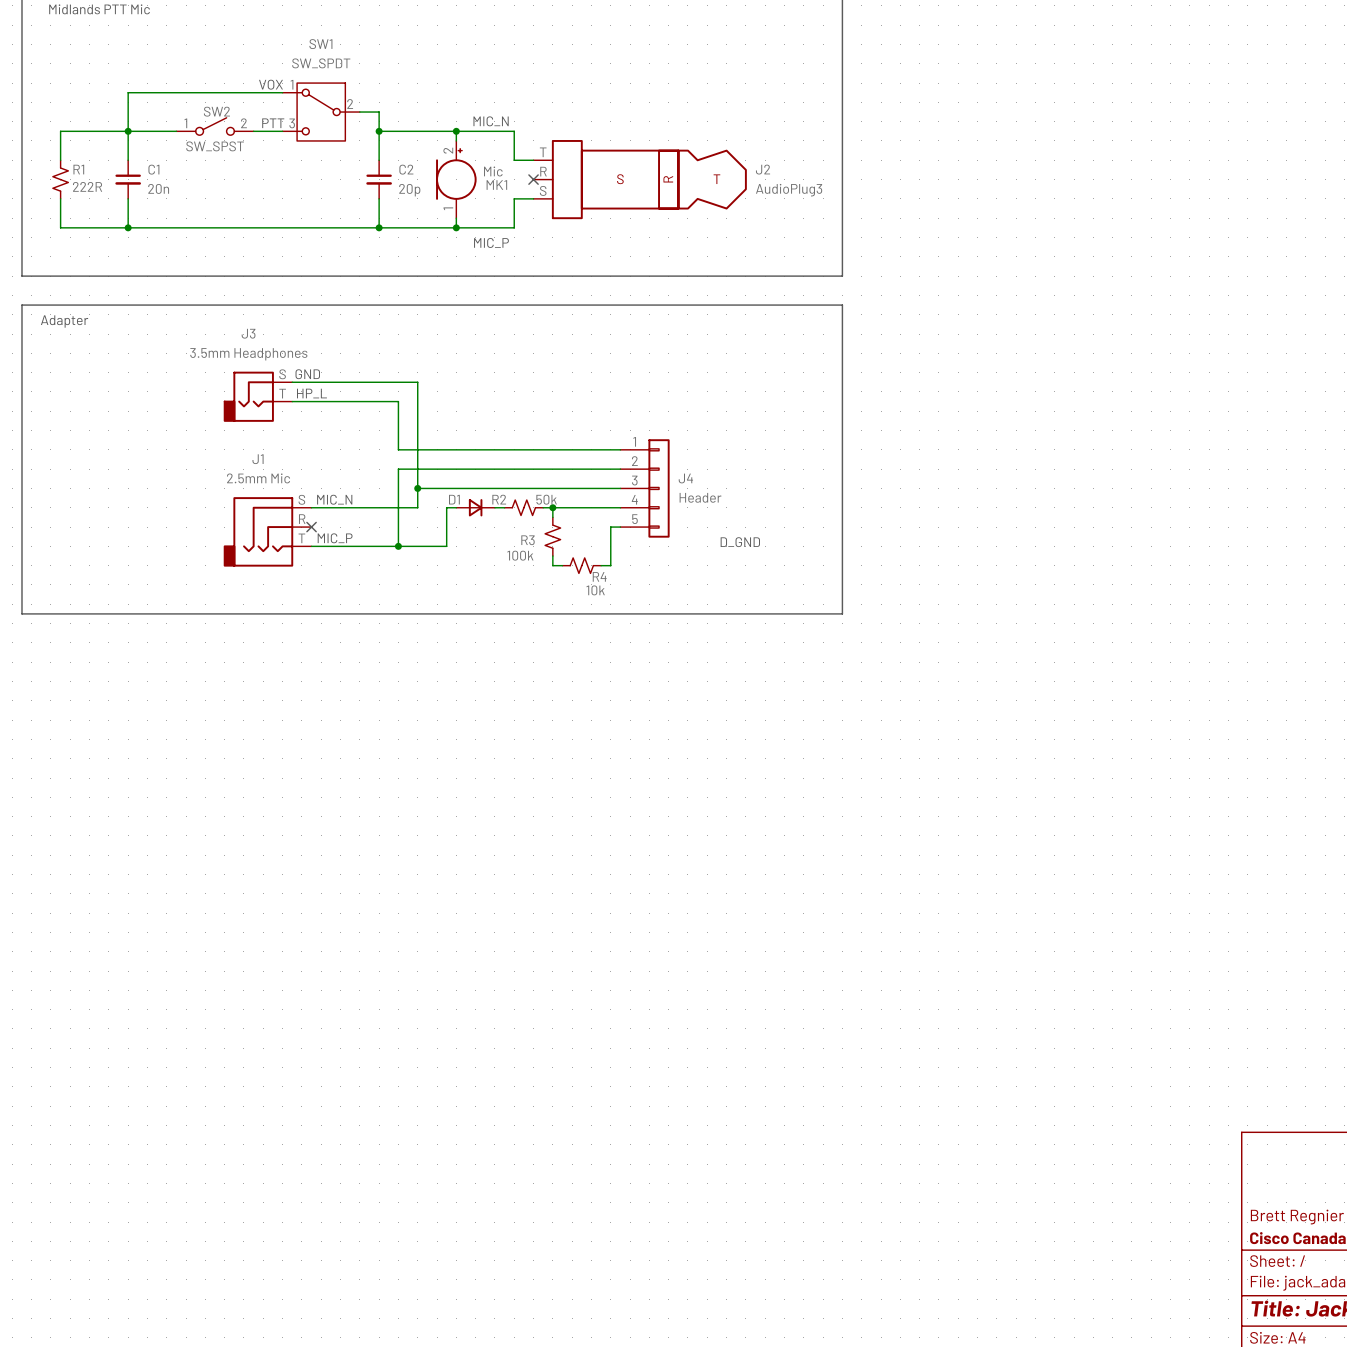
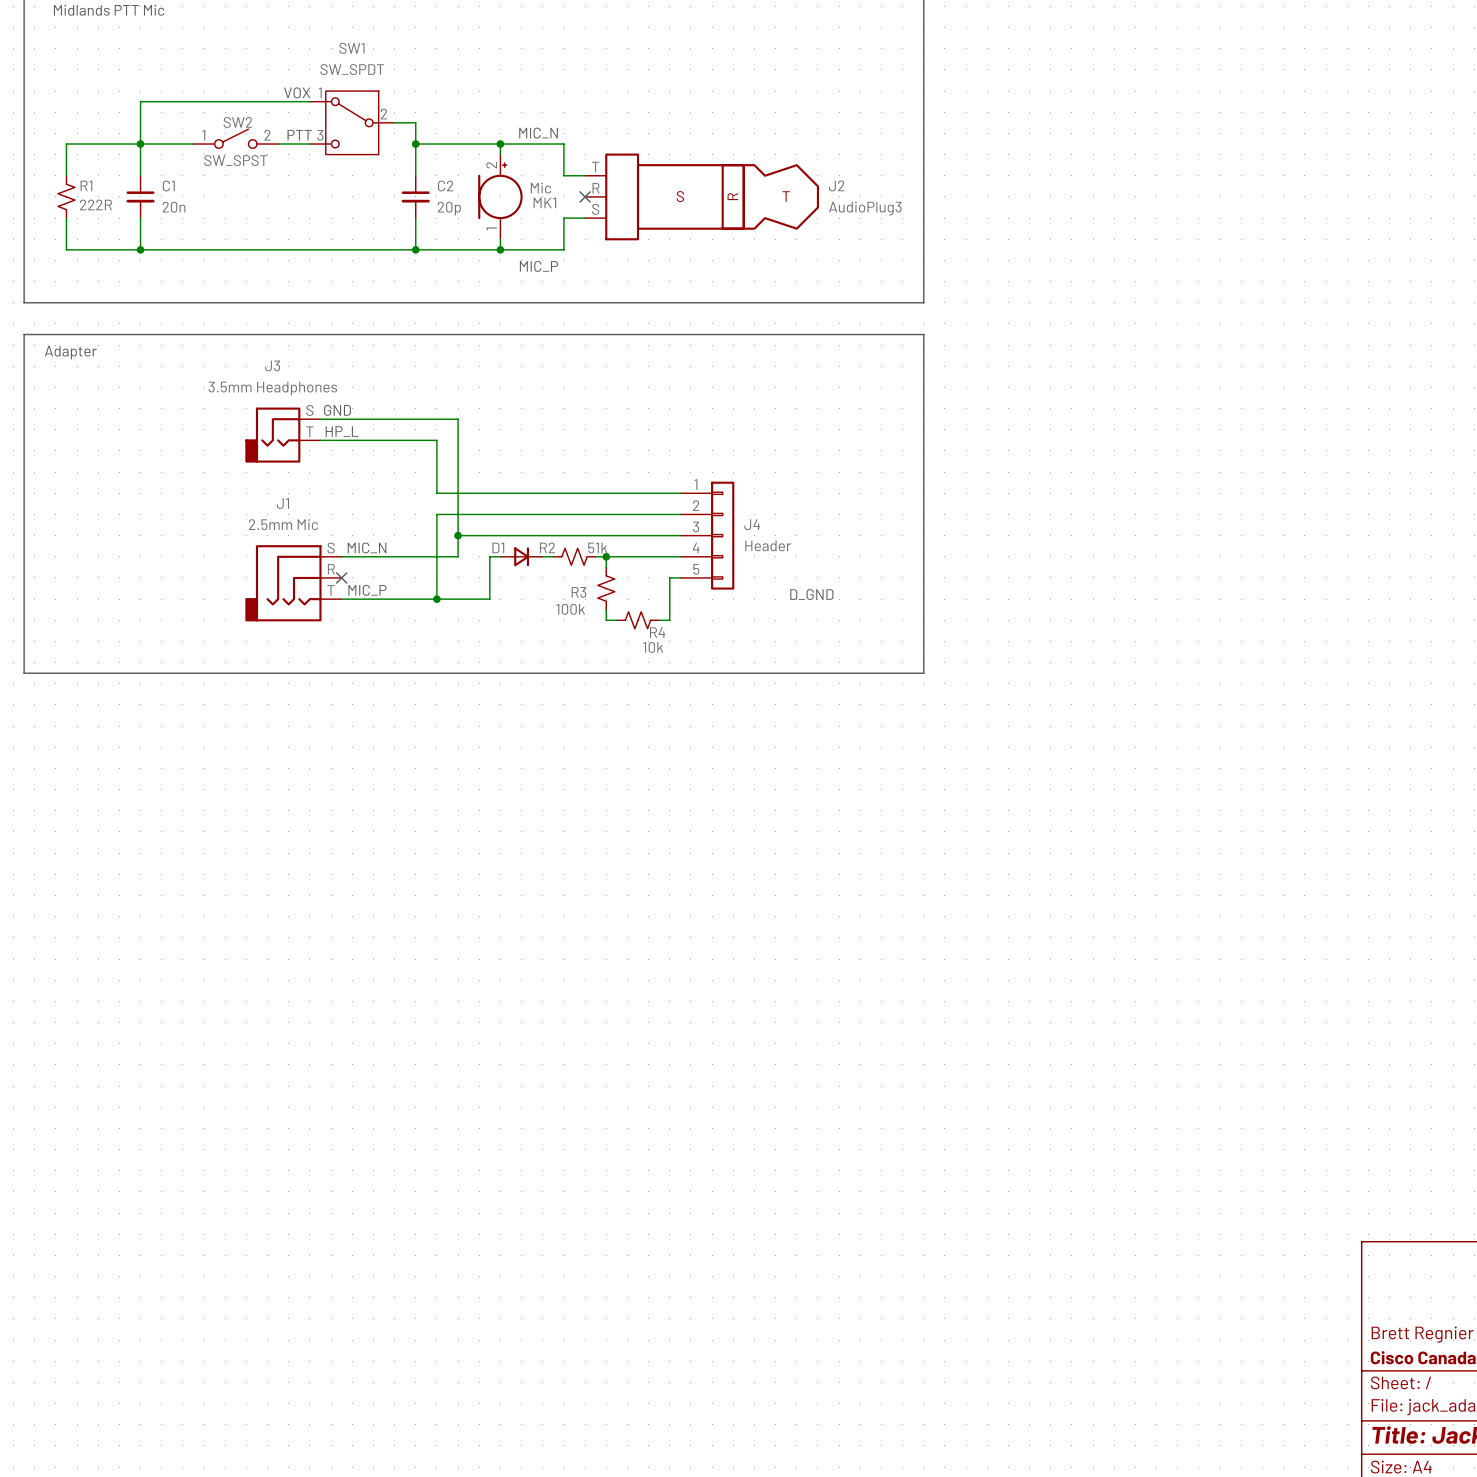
R2 value: 50k (546, 499) -> 51k (597, 547)

